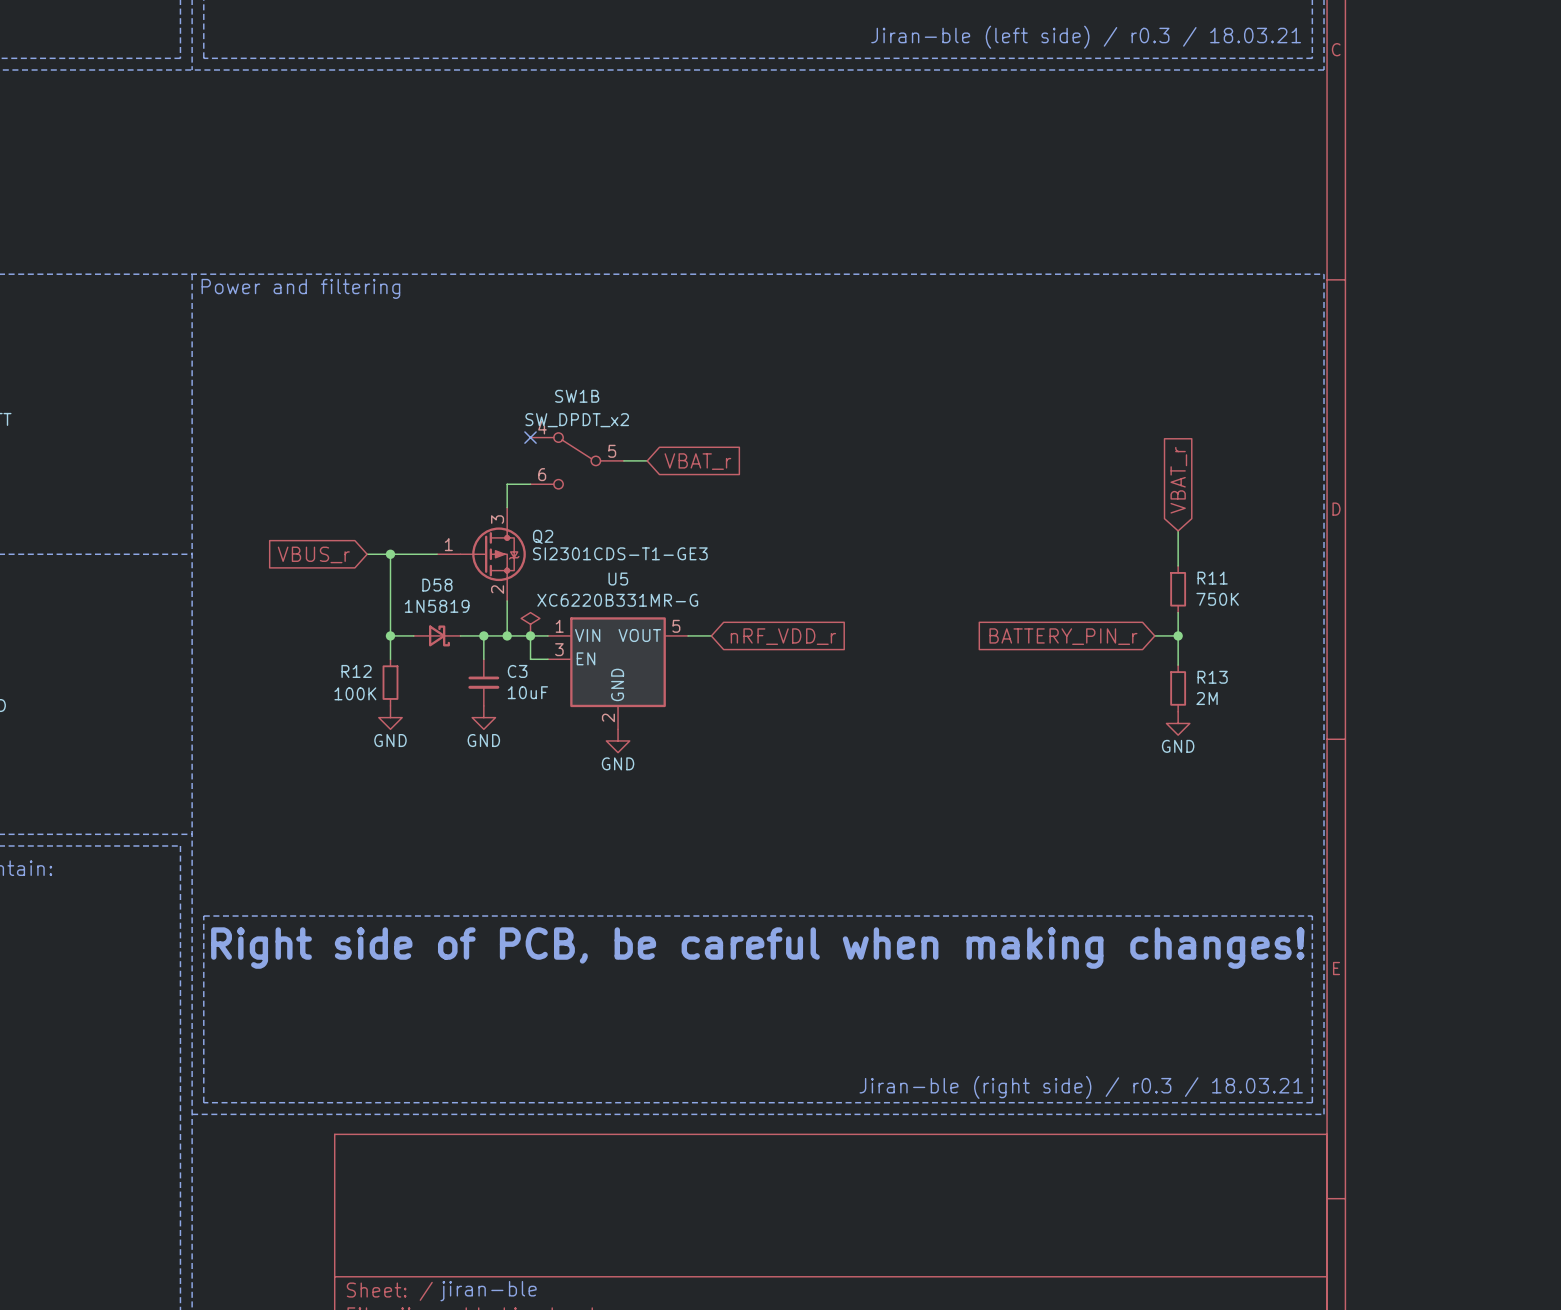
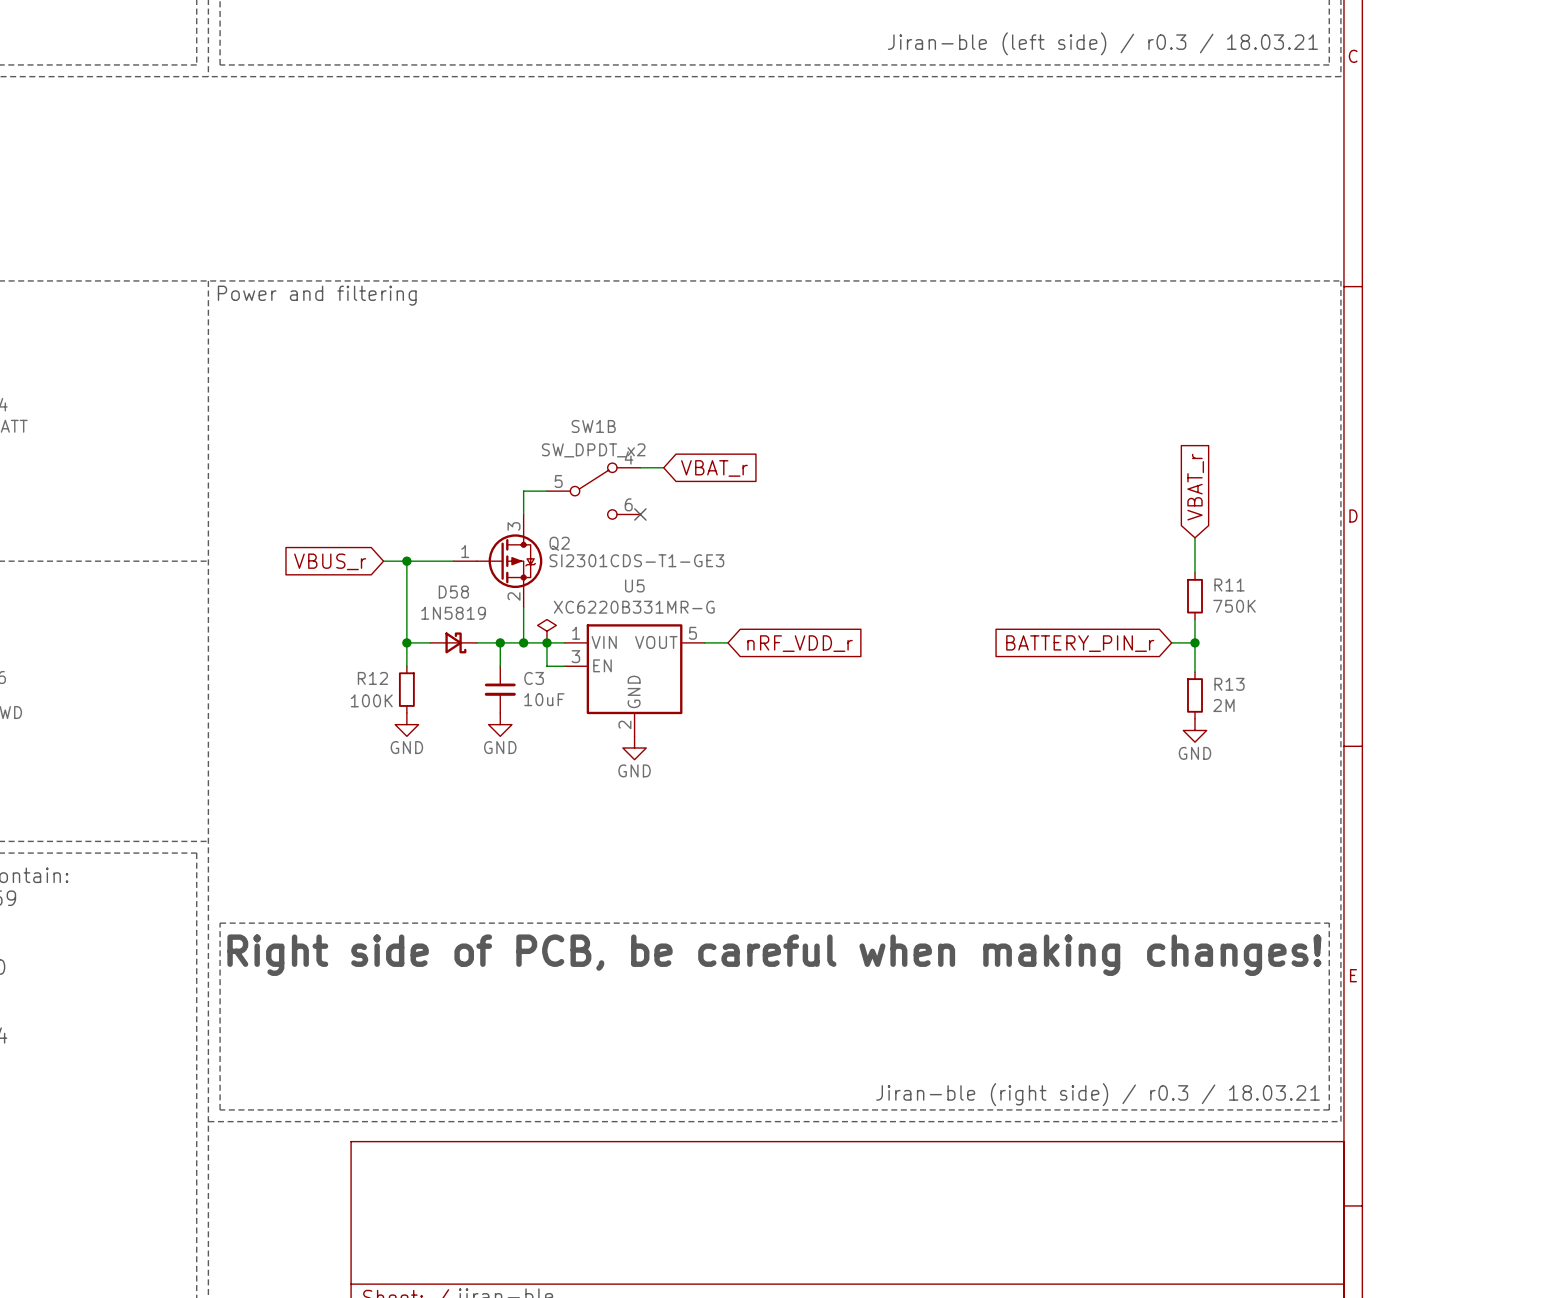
no-connect mark: (530, 437) -> none
SW1B flip: as is (577, 460) -> left-right (593, 491)
no-connect mark: none -> (640, 514)

